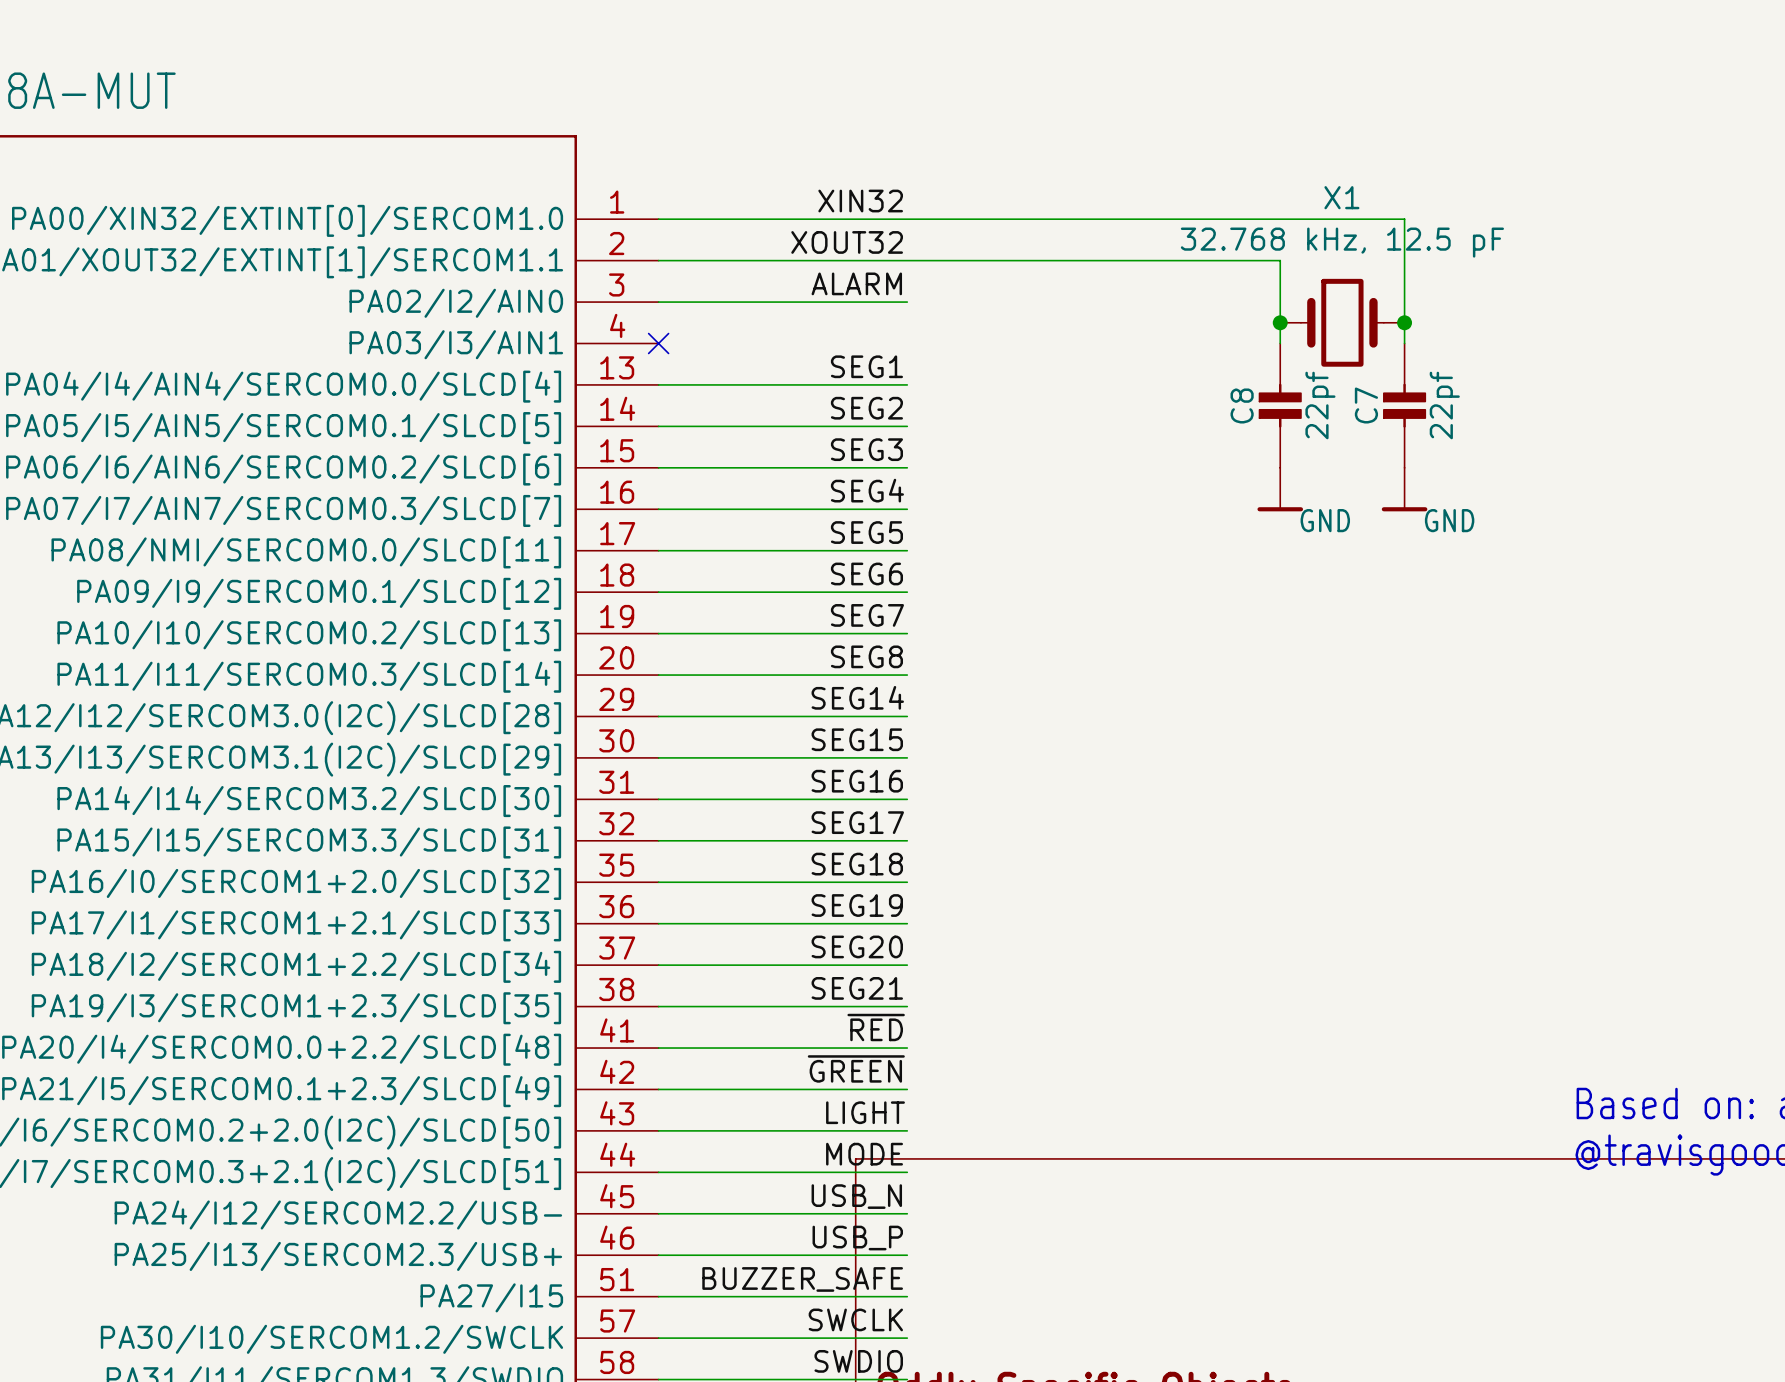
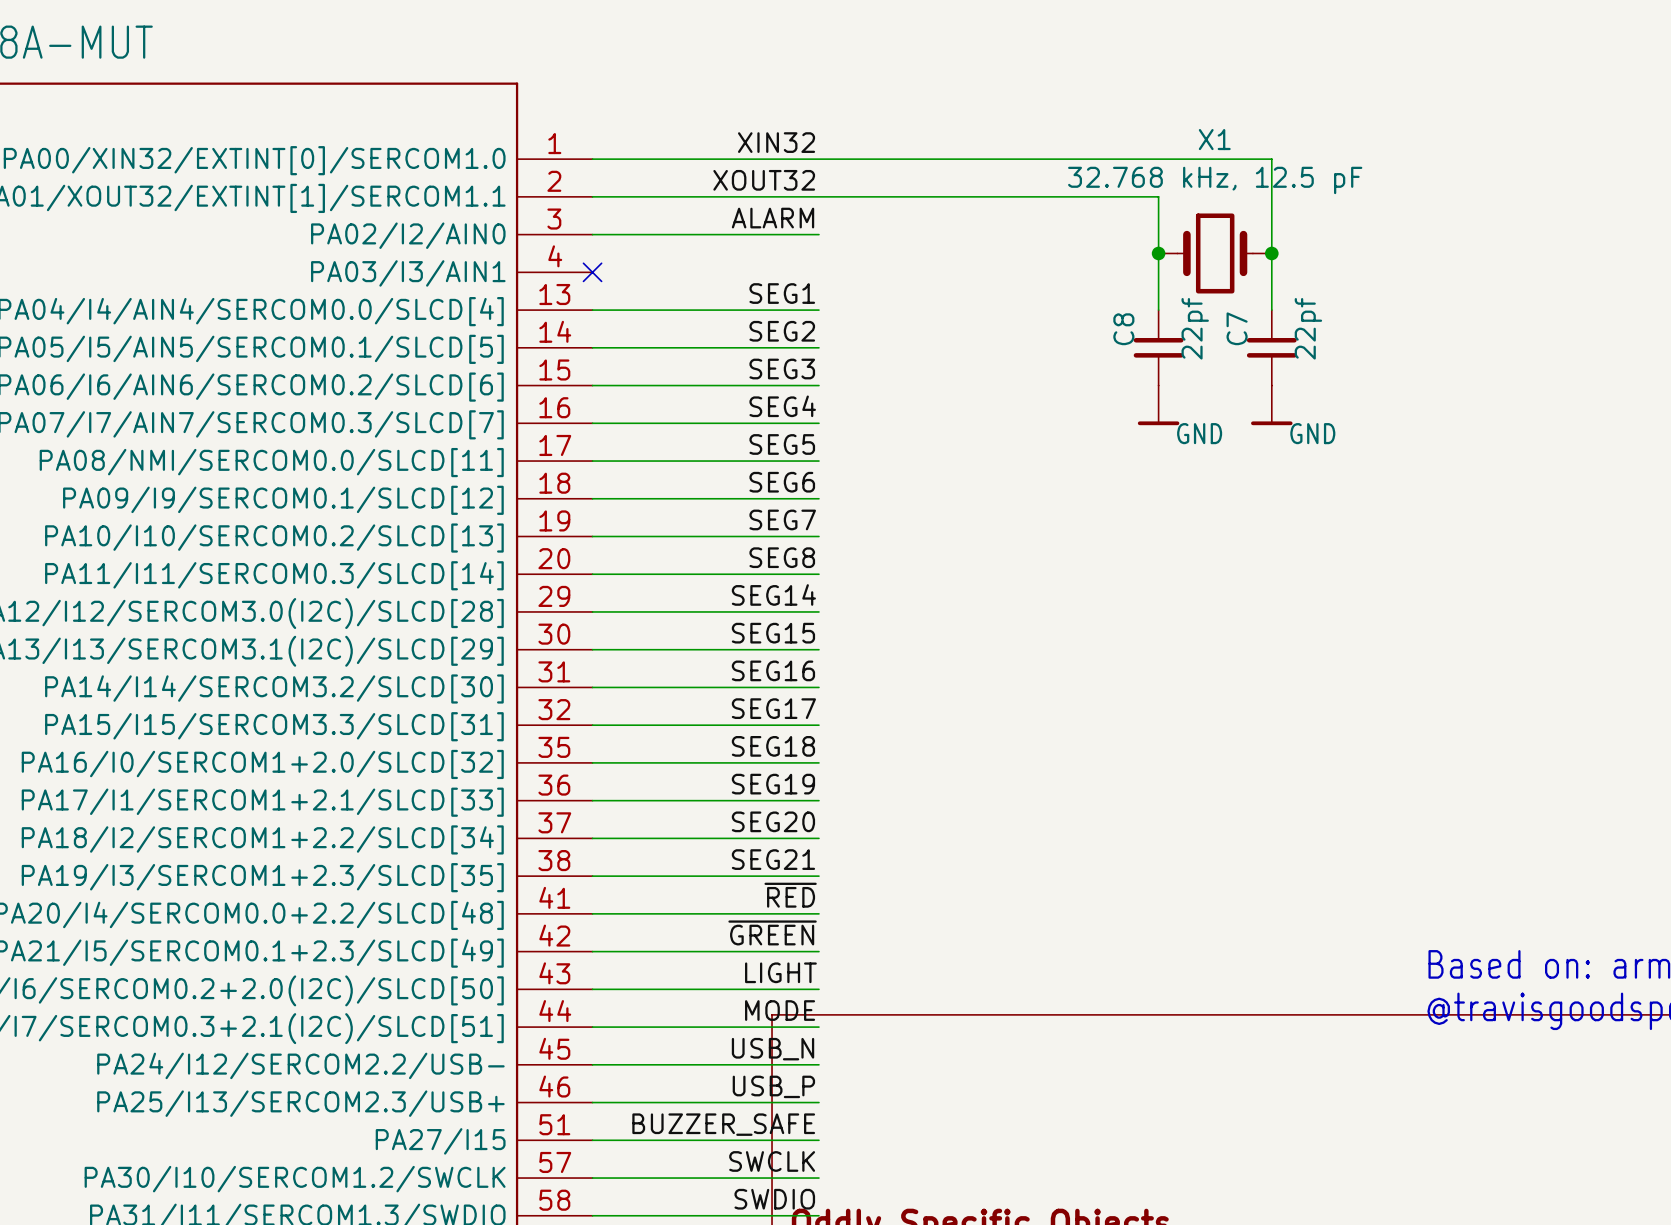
C8 symbol: [1259, 343, 1301, 468] -> [1133, 310, 1184, 386]
C7 symbol: [1383, 343, 1426, 468] -> [1246, 310, 1297, 386]

